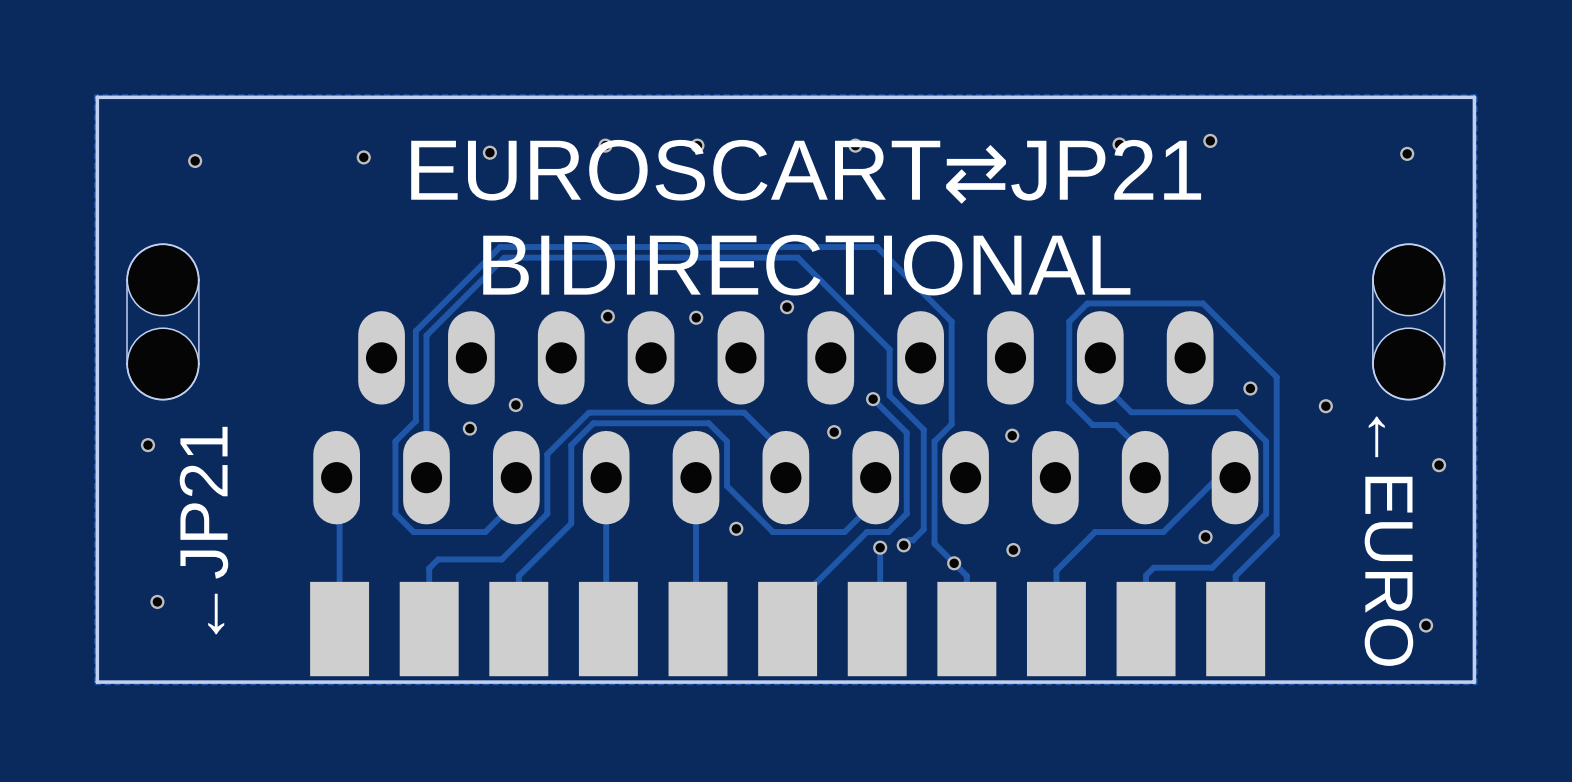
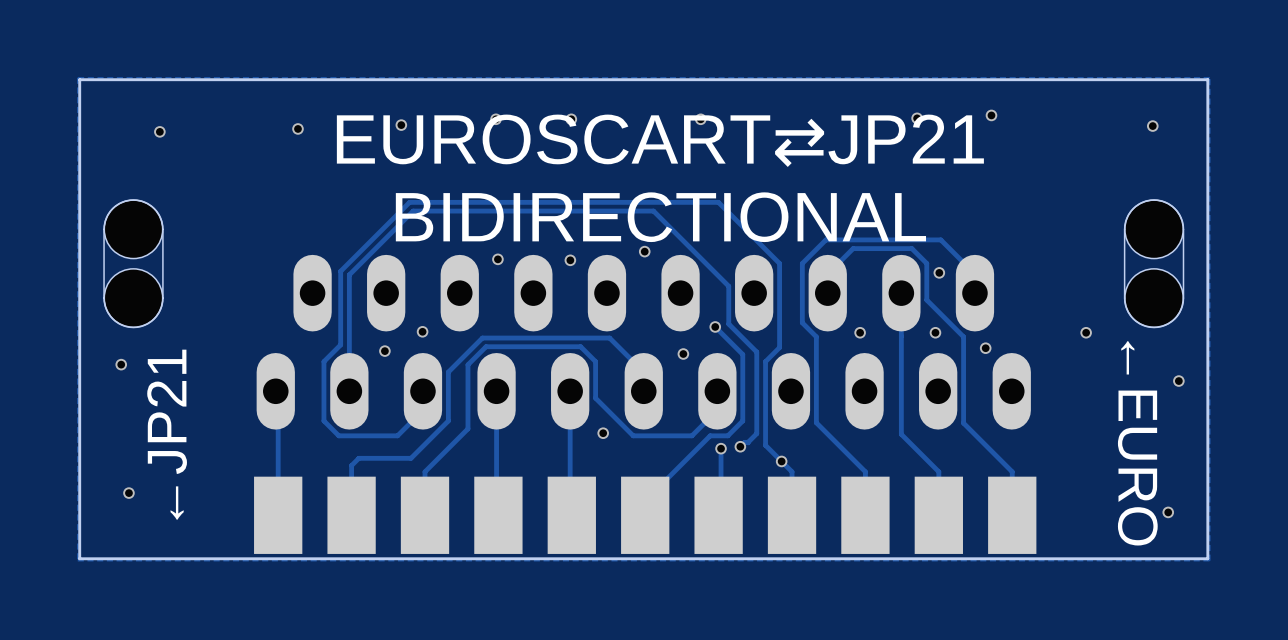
track: (1087, 303) (1069, 321) (1069, 401) (1092, 425) (1115, 425) (1145, 454) (1145, 477) -> (890, 248) (853, 248) (827, 274) (827, 293)
track: (1113, 303) (1203, 303) (1276, 377) (1276, 534) (1235, 575) -> (911, 248) (926, 263) (926, 300) (963, 336) (963, 423) (1012, 471)
via: none -> (939, 272)
track: (1100, 381) (1131, 412) (1236, 412) (1266, 441) (1266, 513) (1212, 567) (1153, 567) (1146, 575) -> (901, 312) (901, 434) (938, 471)
via: (1250, 388) -> none
via: none -> (935, 332)
via: none -> (985, 348)
via position: (1012, 435) -> (860, 332)
track: (1235, 477) (1217, 477) (1163, 532) (1095, 532) (1056, 570) (1056, 575) -> (974, 293) (974, 274) (940, 239) (825, 239) (802, 263) (802, 322) (816, 336) (816, 422) (865, 471)
via: (1205, 537) -> none
via: (1013, 550) -> none

